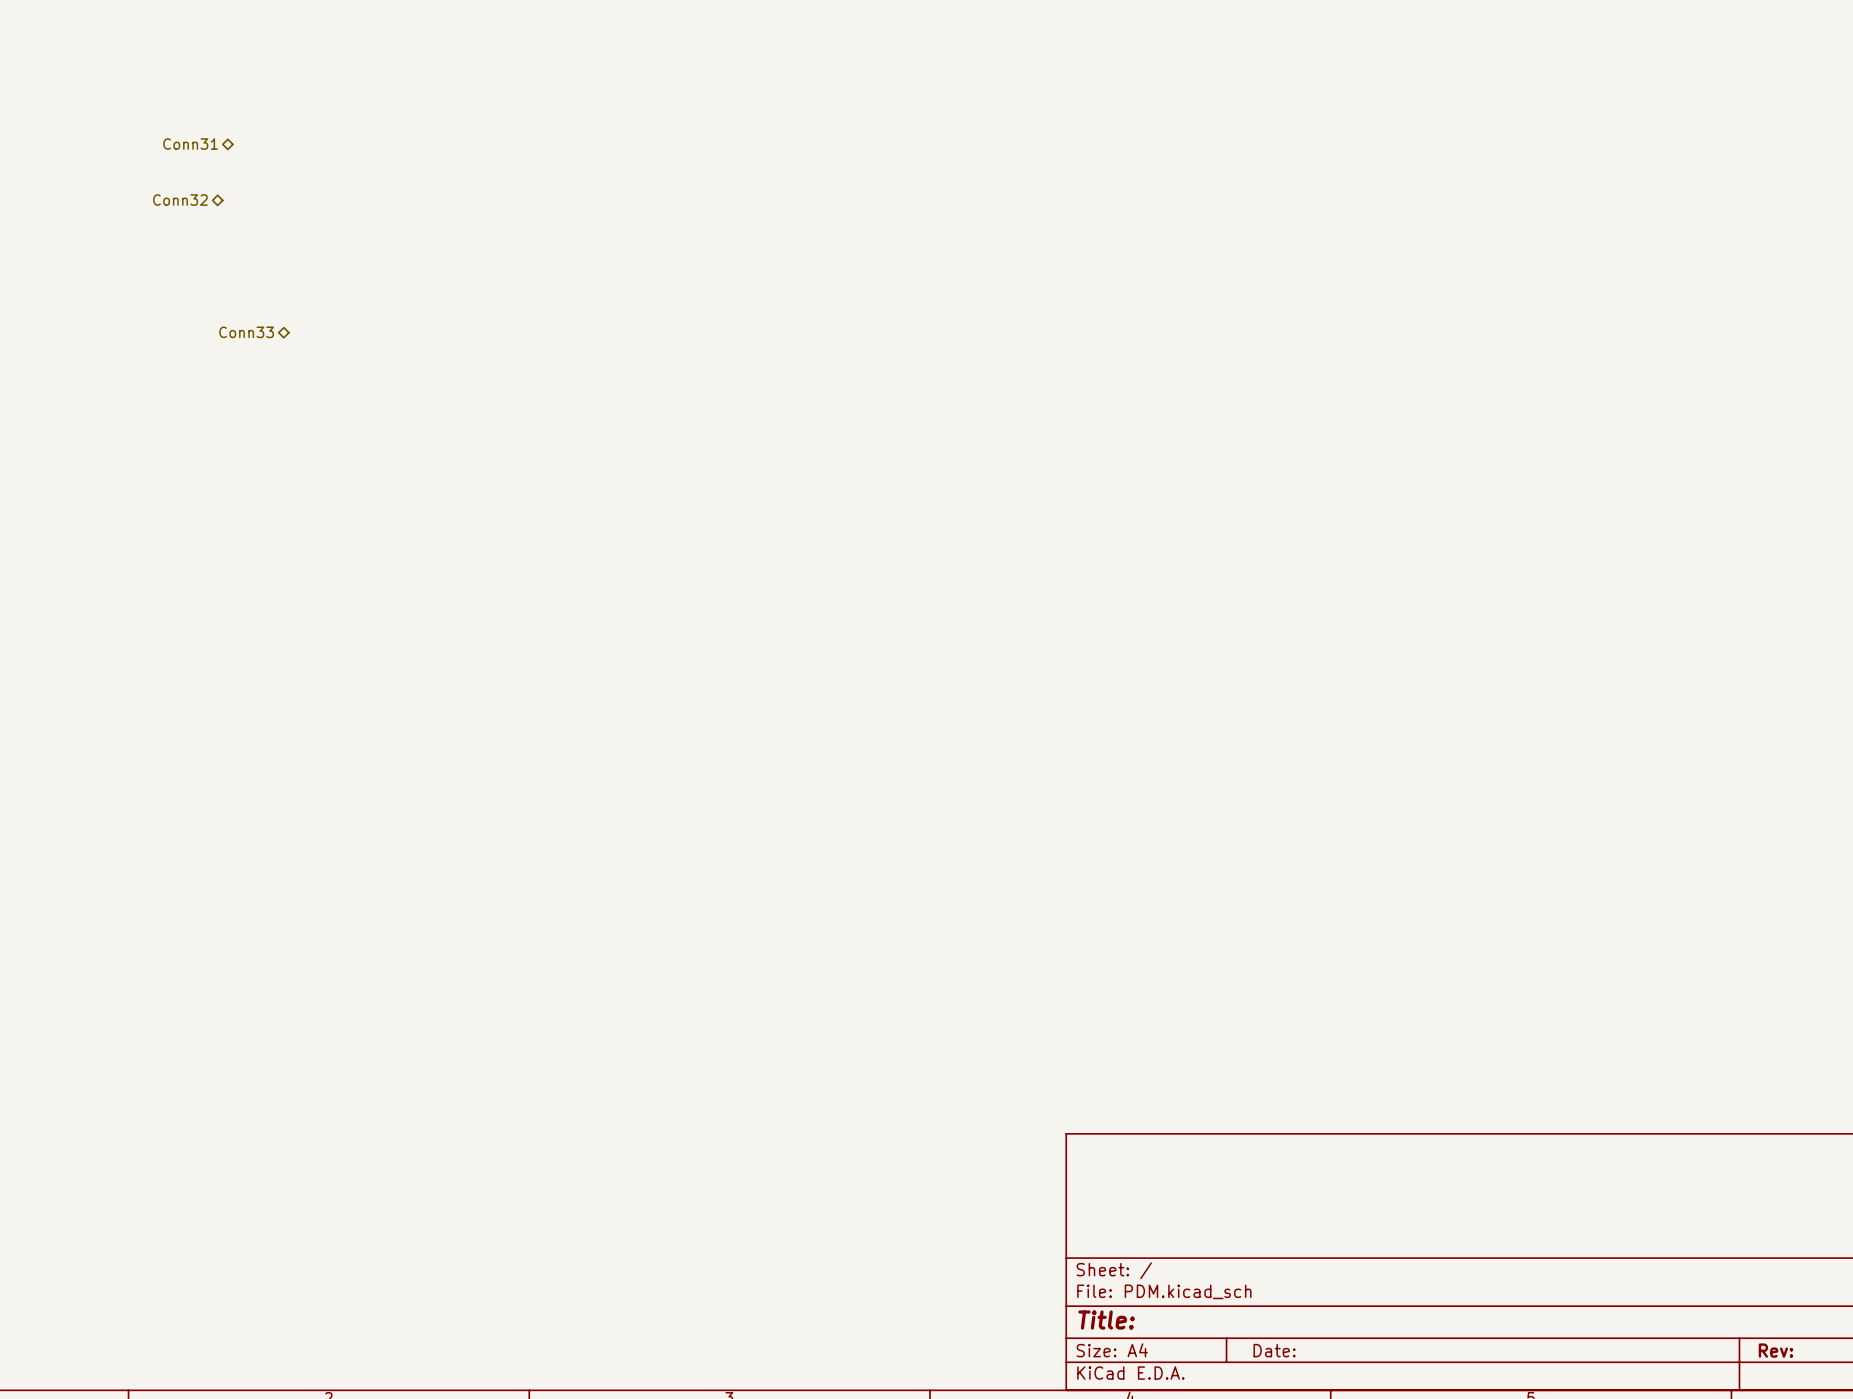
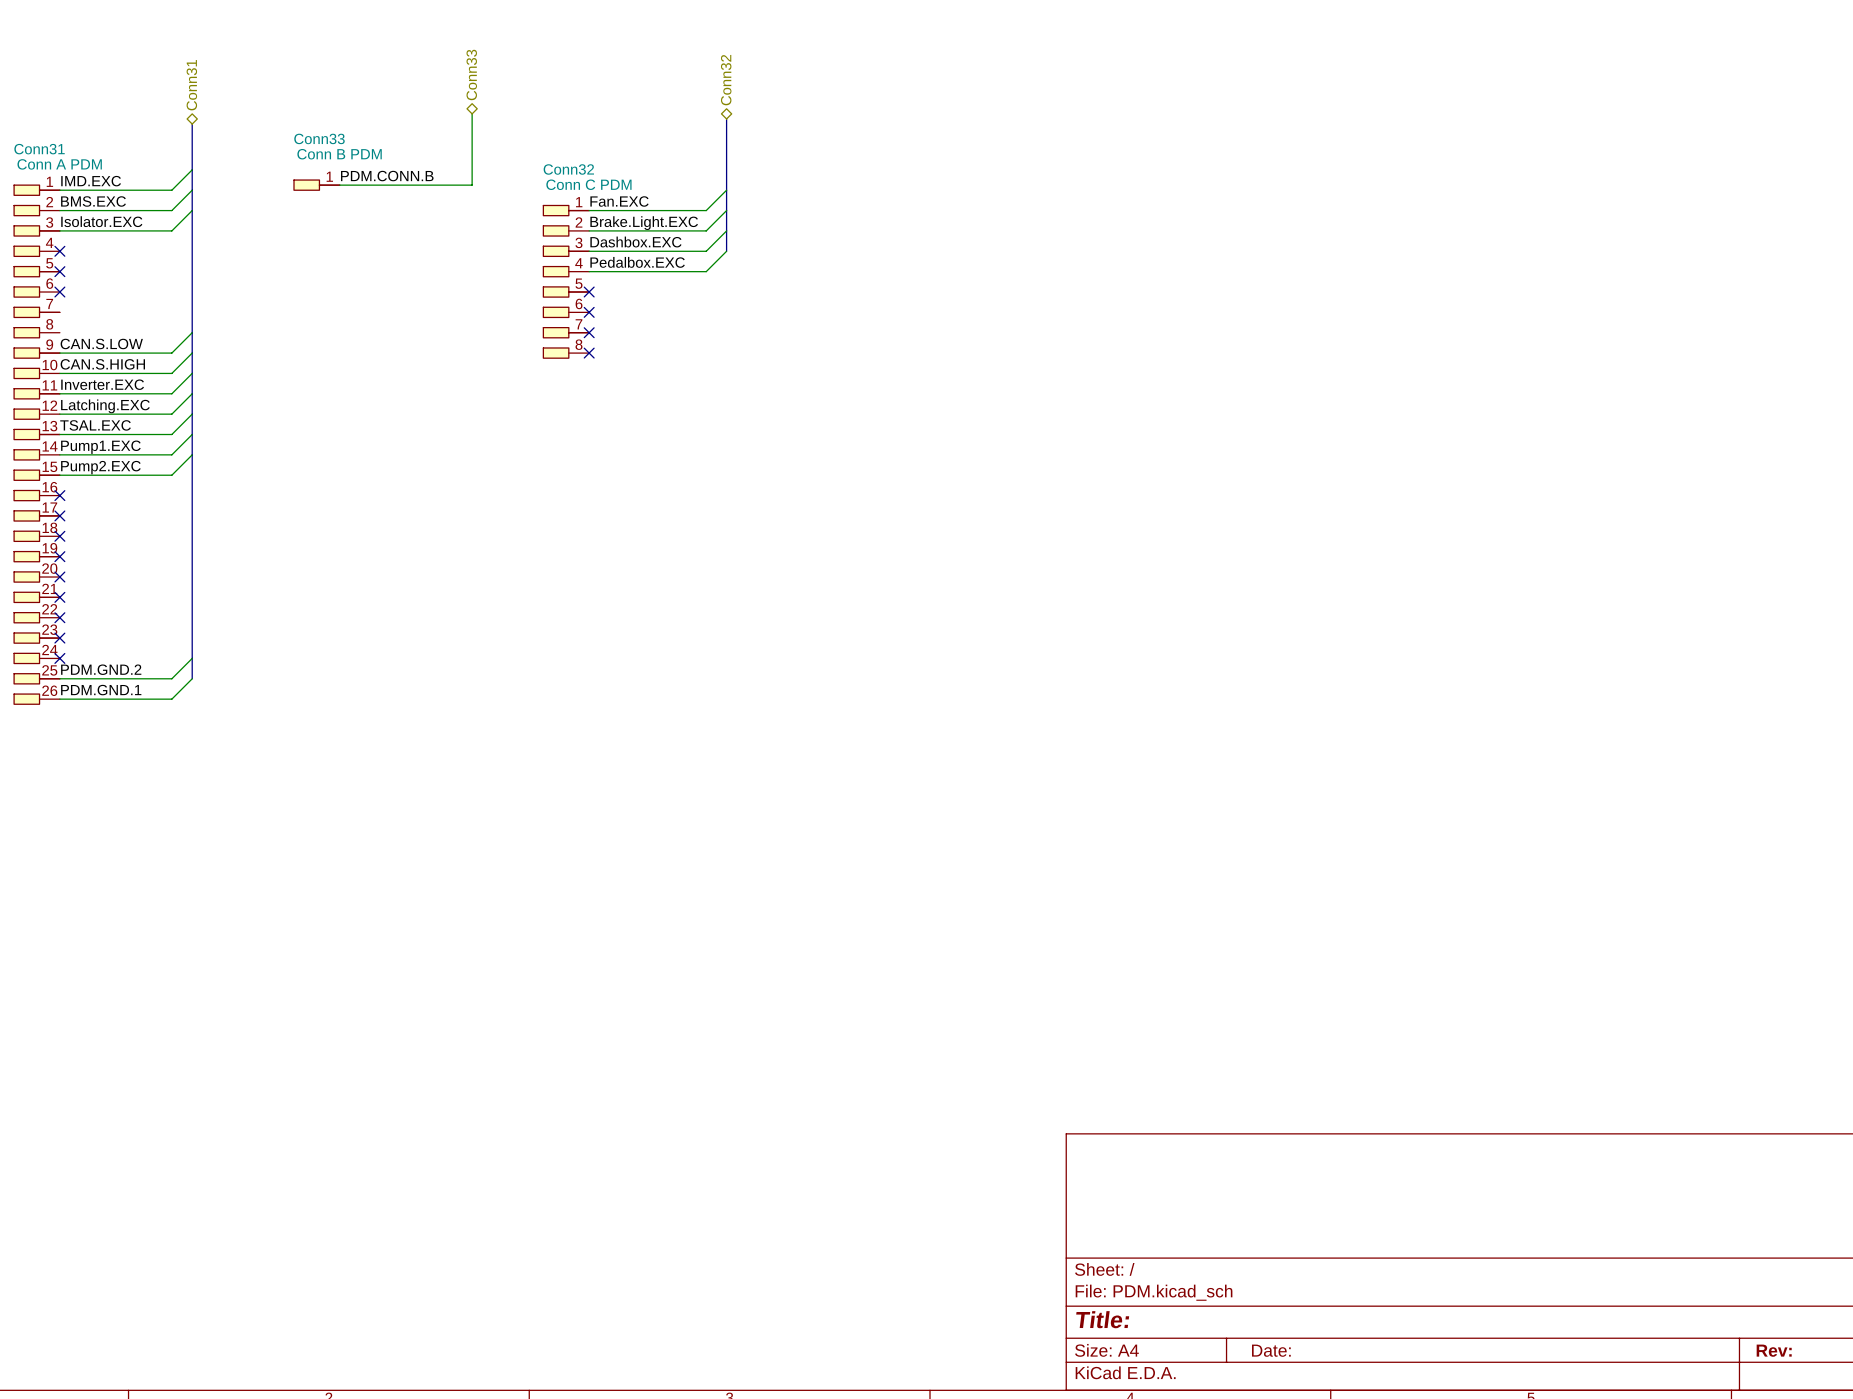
hierarchical label: none -> Conn33 (471, 74)
hierarchical label: none -> Conn32 (726, 80)
wire: none -> (472, 113) (472, 185) (339, 185)
bus: none -> (726, 118) (726, 251)
bus: none -> (192, 124) (192, 678)
hierarchical label rotation: 0° (190, 144) -> 90° clockwise (191, 85)
hierarchical label position: Conn31 (190, 144) -> Conn31 (191, 85)
wire: none -> (192, 169) (171, 190) (59, 190)
label: none -> PDM.CONN.B (387, 176)
label: none -> IMD.EXC (91, 181)
Conn33: none -> Conn B PDM (316, 185)
wire: none -> (192, 190) (171, 210) (59, 210)
wire: none -> (726, 190) (706, 210) (589, 210)
hierarchical label: Conn32 (180, 200) -> none
label: none -> BMS.EXC (93, 201)
label: none -> Fan.EXC (619, 201)
wire: none -> (192, 210) (171, 230) (59, 230)
wire: none -> (726, 210) (706, 230) (589, 230)
label: none -> Isolator.EXC (101, 221)
label: none -> Brake.Light.EXC (644, 223)
wire: none -> (726, 230) (706, 251) (589, 251)
label: none -> Dashbox.EXC (635, 242)
no-connect mark: none -> (59, 251)
wire: none -> (726, 251) (706, 271) (589, 271)
label: none -> Pedalbox.EXC (637, 262)
no-connect mark: none -> (59, 271)
Conn32: none -> Conn C PDM (566, 281)
no-connect mark: none -> (59, 292)
no-connect mark: none -> (589, 292)
no-connect mark: none -> (589, 312)
wire: none -> (192, 332) (171, 353) (59, 353)
hierarchical label: Conn33 (246, 332) -> none
no-connect mark: none -> (589, 332)
label: none -> CAN.S.LOW (101, 343)
wire: none -> (192, 353) (171, 373) (59, 373)
no-connect mark: none -> (589, 353)
label: none -> CAN.S.HIGH (102, 364)
wire: none -> (192, 373) (171, 393) (59, 393)
label: none -> Inverter.EXC (102, 384)
wire: none -> (192, 393) (171, 414) (59, 414)
label: none -> Latching.EXC (105, 406)
wire: none -> (192, 414) (171, 434) (59, 434)
label: none -> TSAL.EXC (95, 425)
wire: none -> (192, 434) (171, 454) (59, 454)
Conn31: none -> Conn A PDM (36, 444)
label: none -> Pump1.EXC (100, 447)
wire: none -> (192, 454) (171, 475) (59, 475)
label: none -> Pump2.EXC (100, 467)
no-connect mark: none -> (59, 495)
no-connect mark: none -> (59, 515)
no-connect mark: none -> (59, 536)
no-connect mark: none -> (59, 556)
no-connect mark: none -> (59, 577)
no-connect mark: none -> (59, 597)
no-connect mark: none -> (59, 617)
no-connect mark: none -> (59, 638)
no-connect mark: none -> (59, 658)
wire: none -> (192, 658) (171, 678) (59, 678)
label: none -> PDM.GND.2 (101, 669)
wire: none -> (192, 678) (171, 699) (59, 699)
label: none -> PDM.GND.1 (101, 690)

